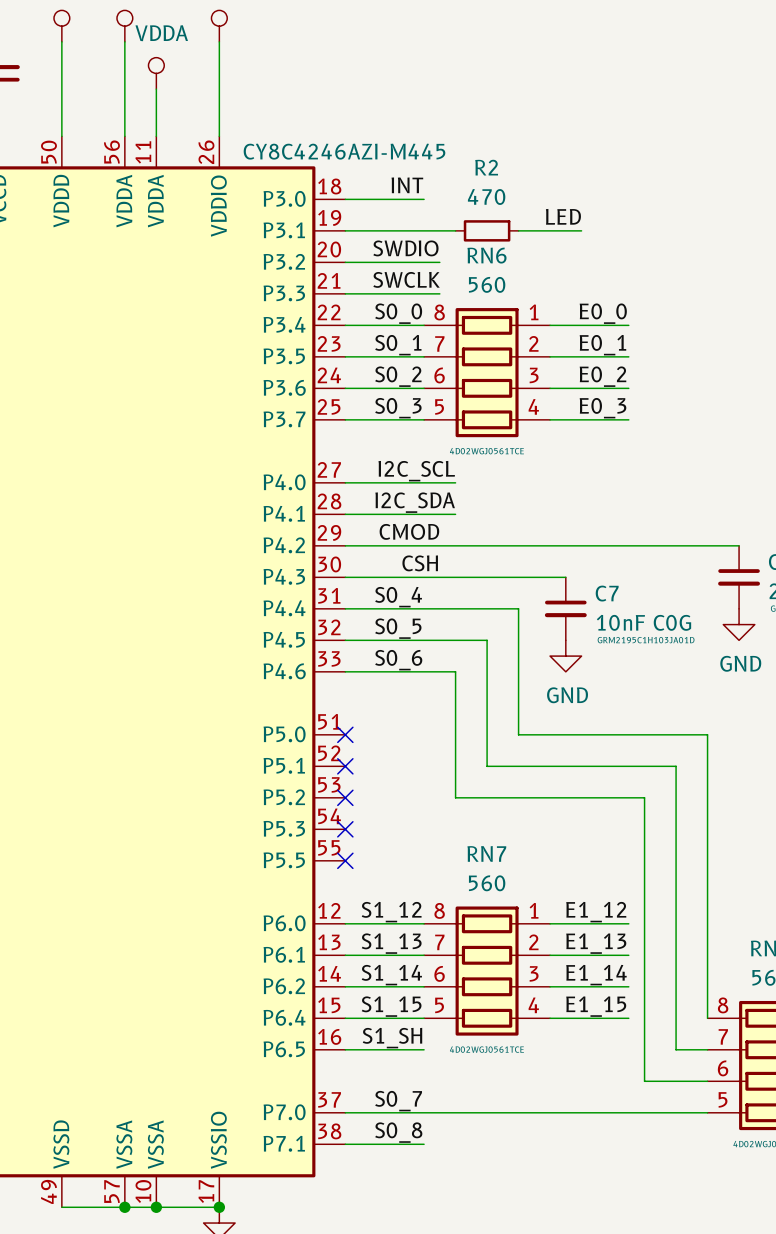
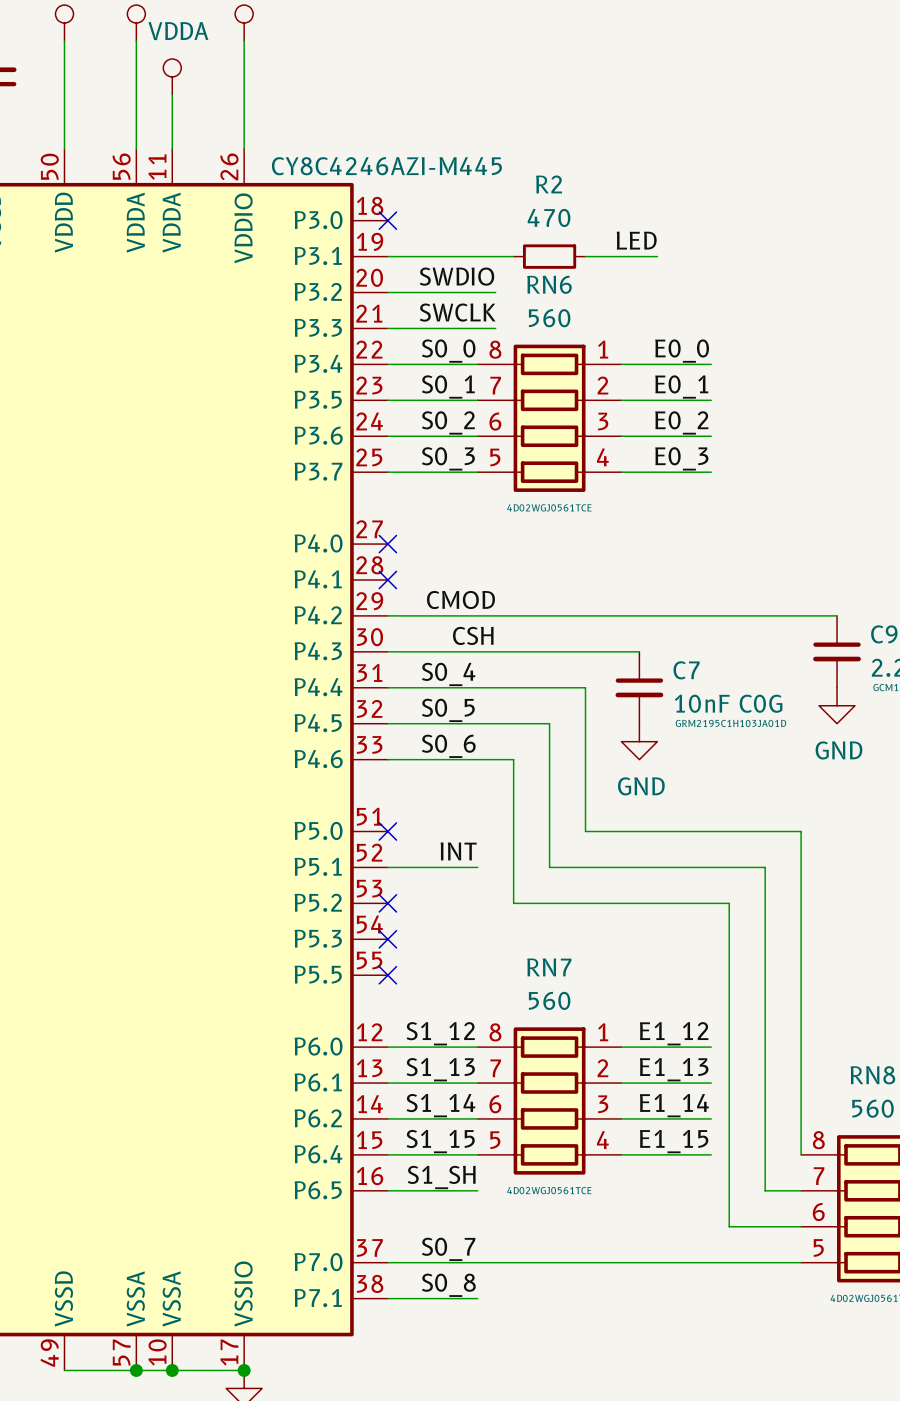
label: INT (407, 185) -> none
wire: (345, 199) (424, 199) -> none
no-connect mark: none -> (387, 220)
label: I2C_SCL (416, 471) -> none
wire: (345, 482) (455, 482) -> none
no-connect mark: none -> (387, 544)
label: I2C_SDA (415, 502) -> none
wire: (345, 514) (455, 514) -> none
no-connect mark: none -> (387, 579)
label: none -> INT (458, 851)
wire: none -> (387, 867) (477, 867)
no-connect mark: (345, 766) -> none

